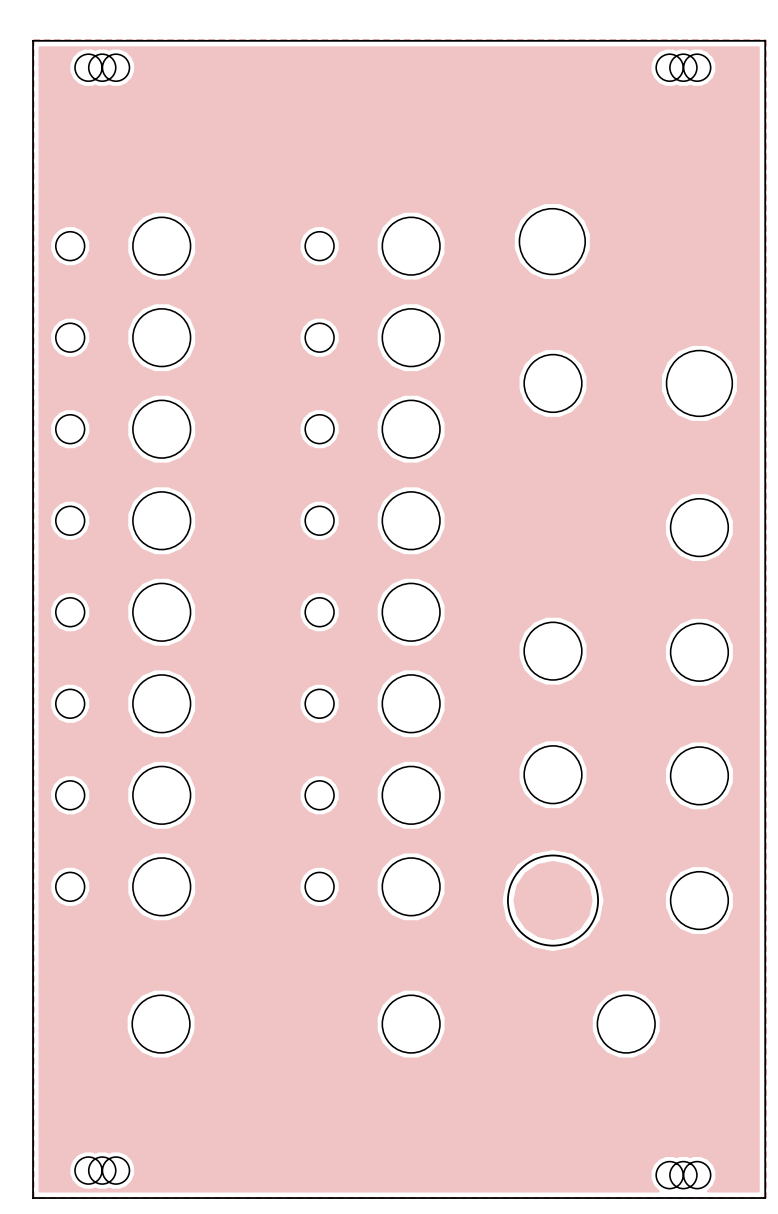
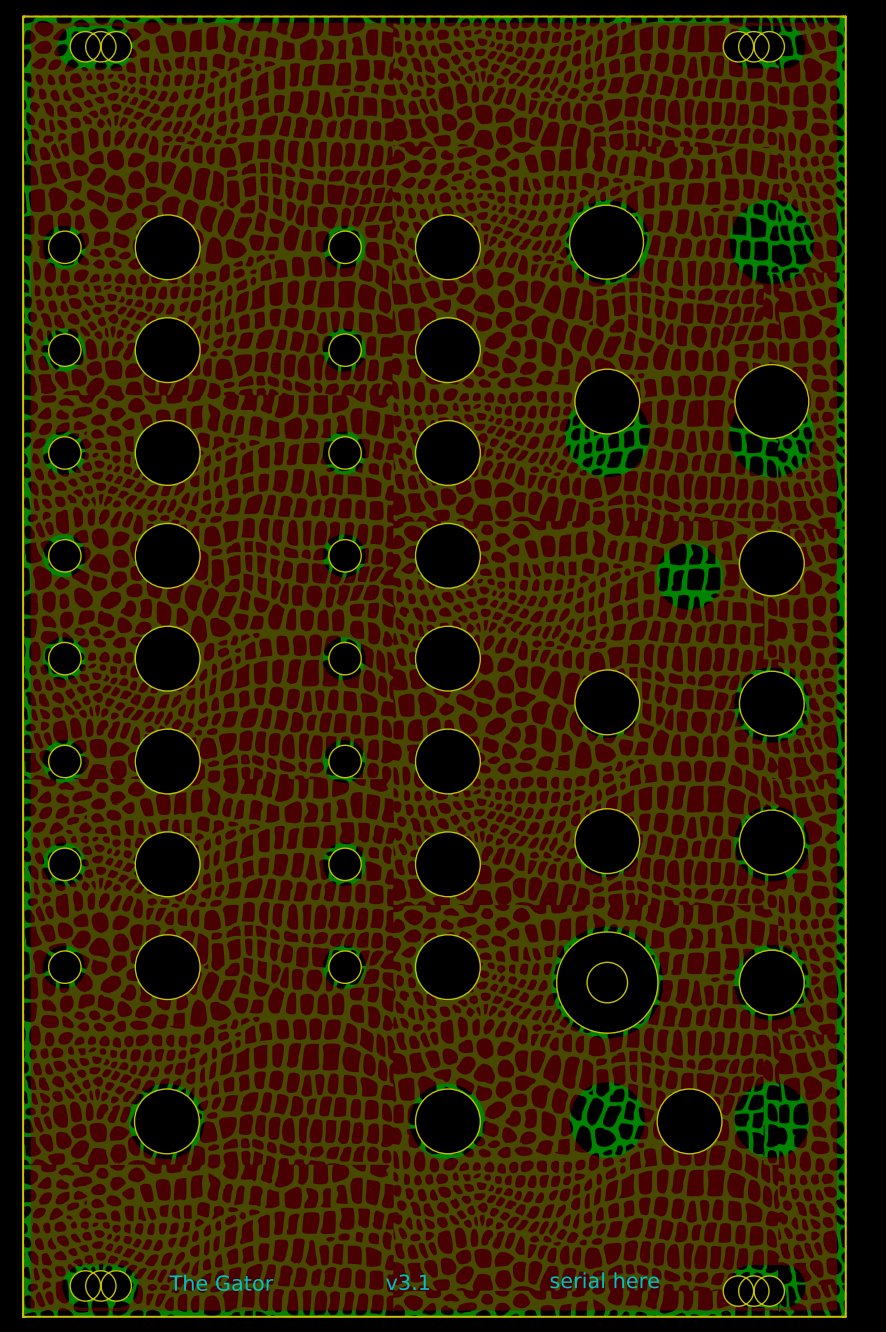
drawing: none -> [23, 16, 846, 1318]
round board edge: [507, 854, 599, 947] -> none
part: none -> (607, 982)
text: none -> serial here (604, 1280)
text: none -> The Gator (221, 1282)
text: none -> v3.1 (407, 1282)

